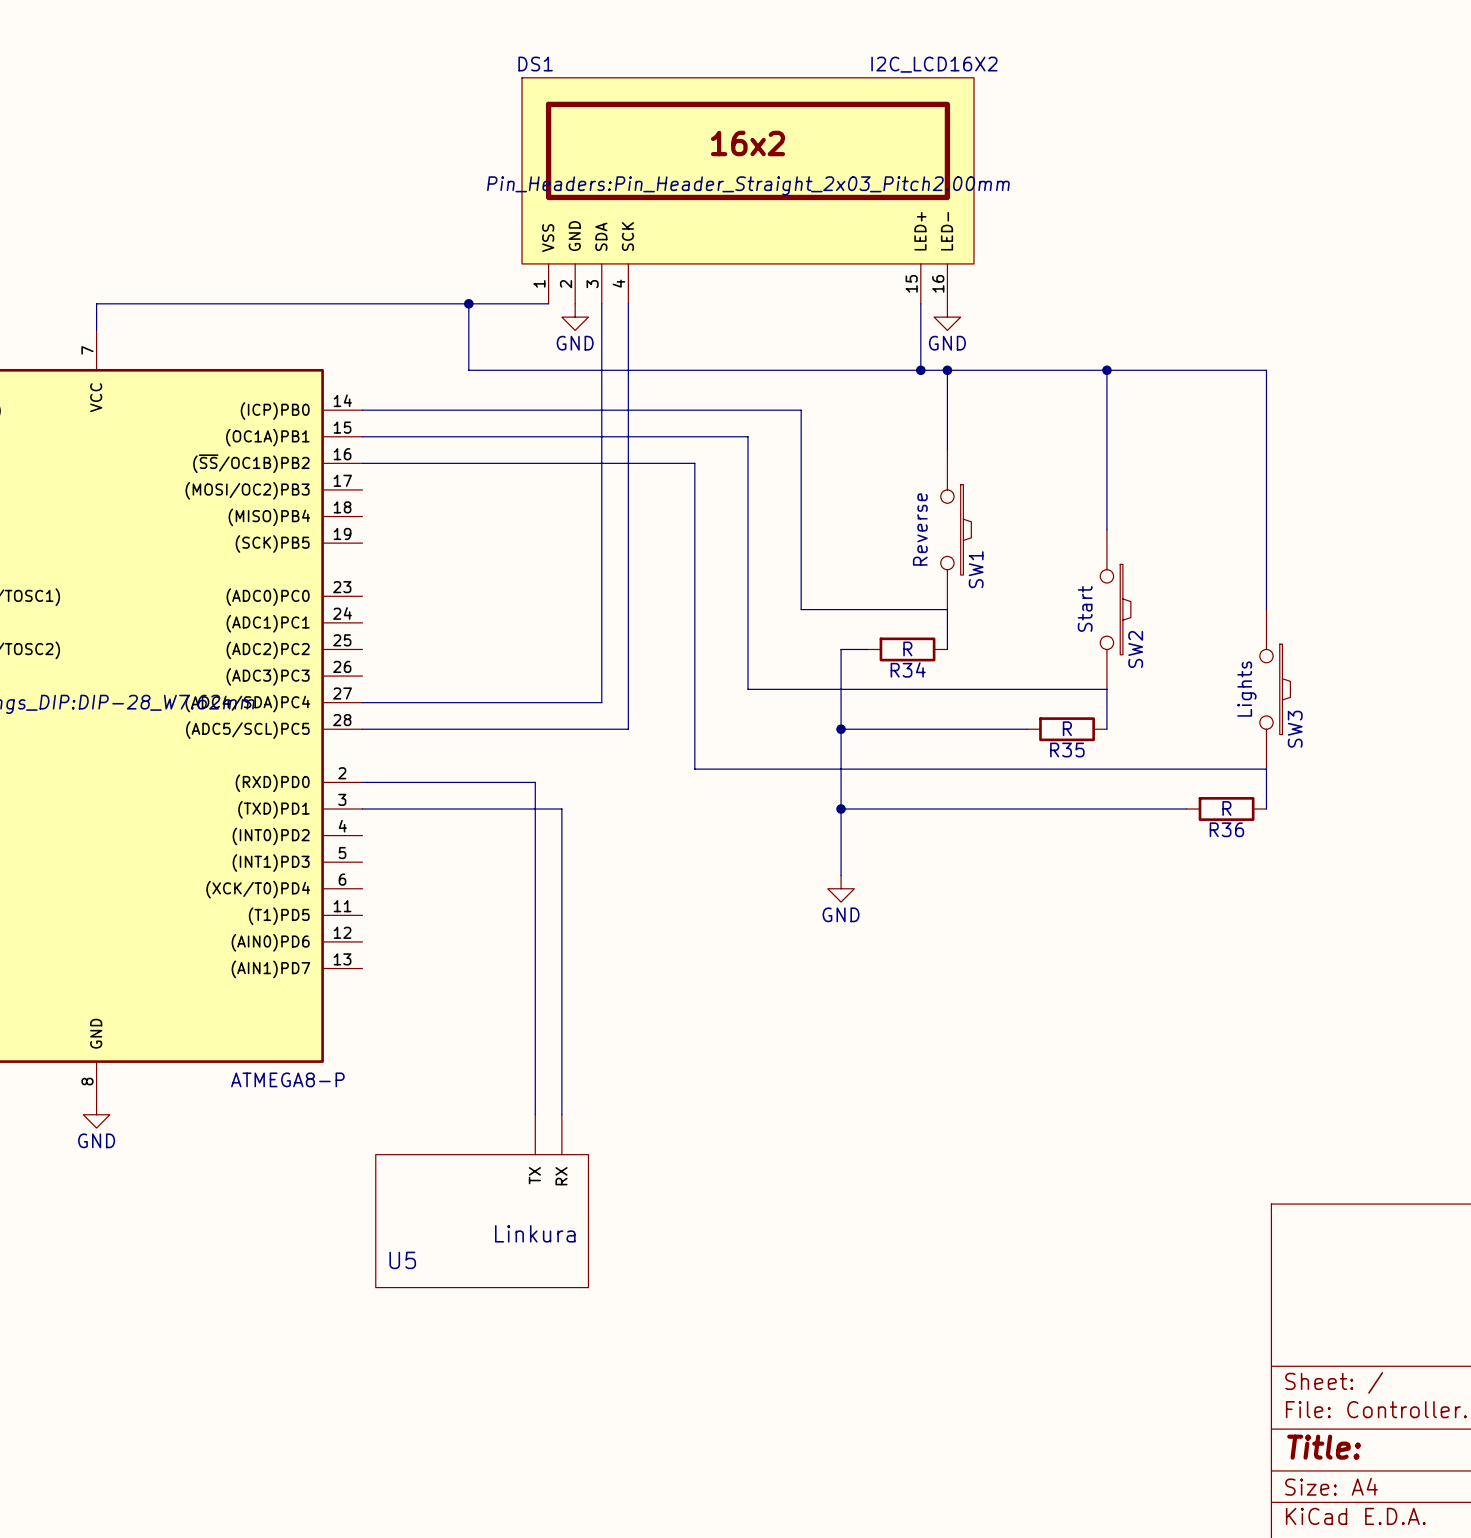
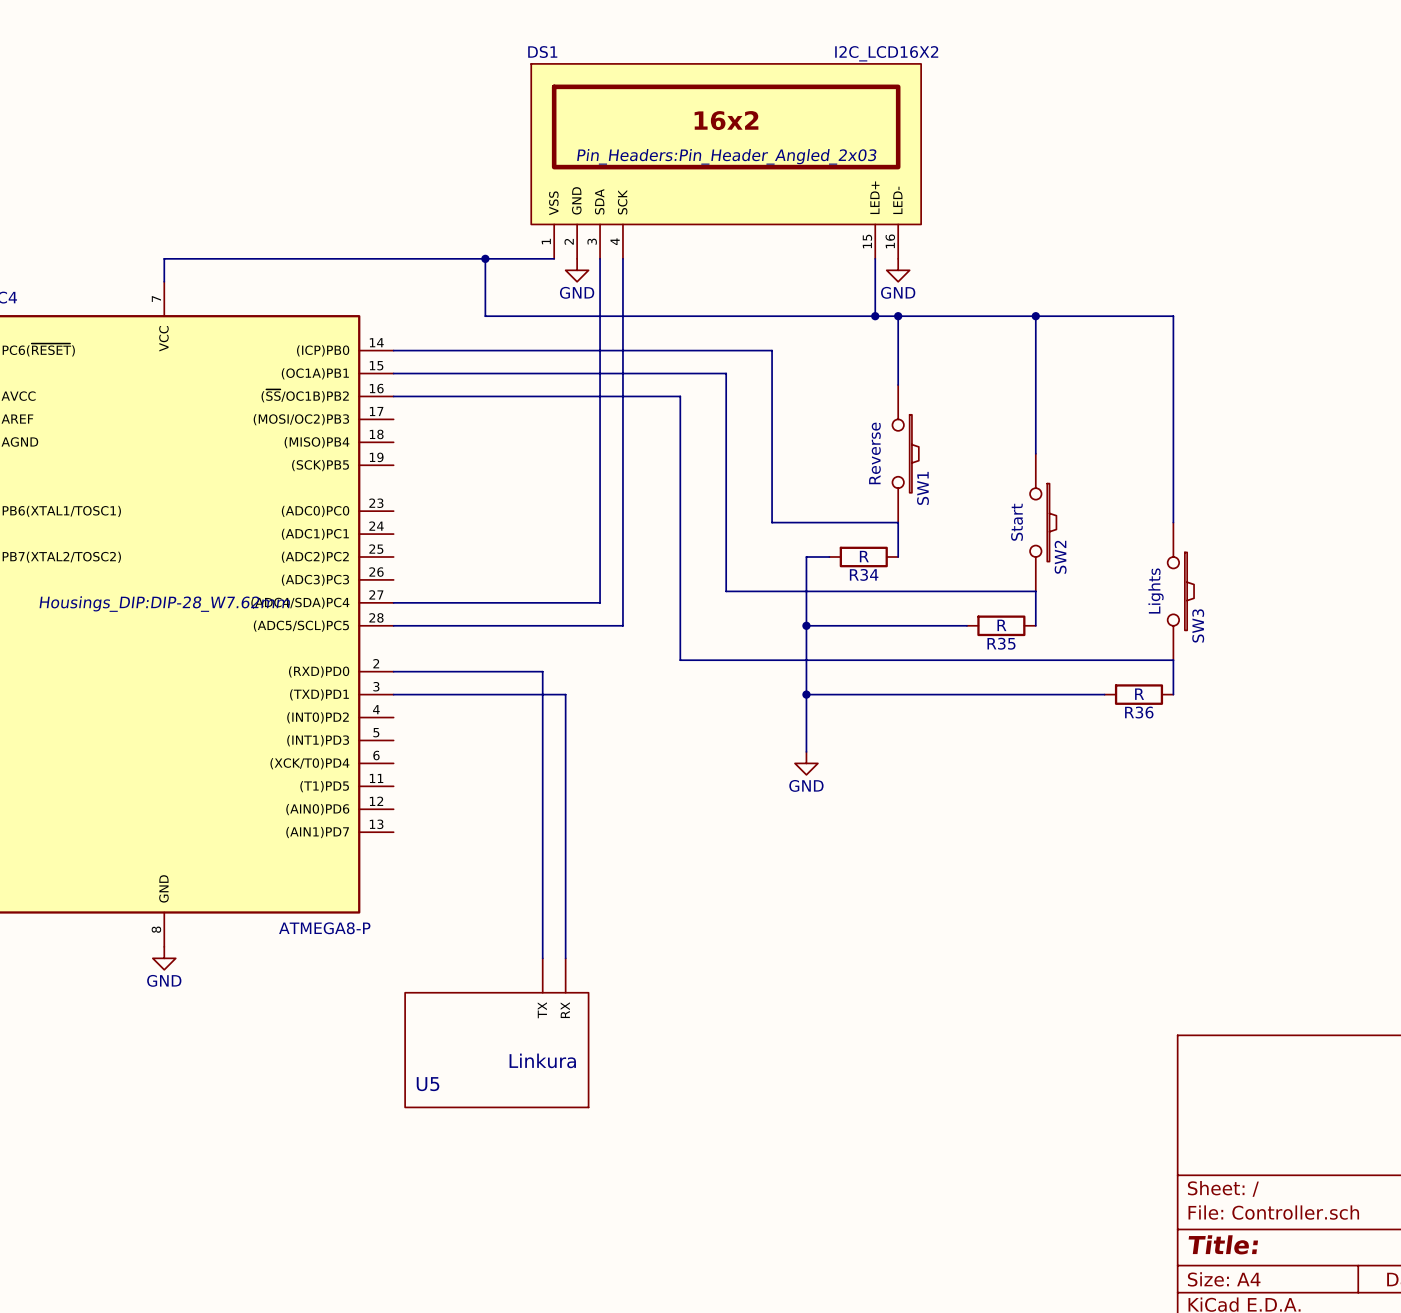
DS1 text: Pin_Headers:Pin_Header_Straight_2x03_Pitch2.00mm (748, 185) -> Pin_Headers:Pin_Header_Angled_2x03 (726, 156)

